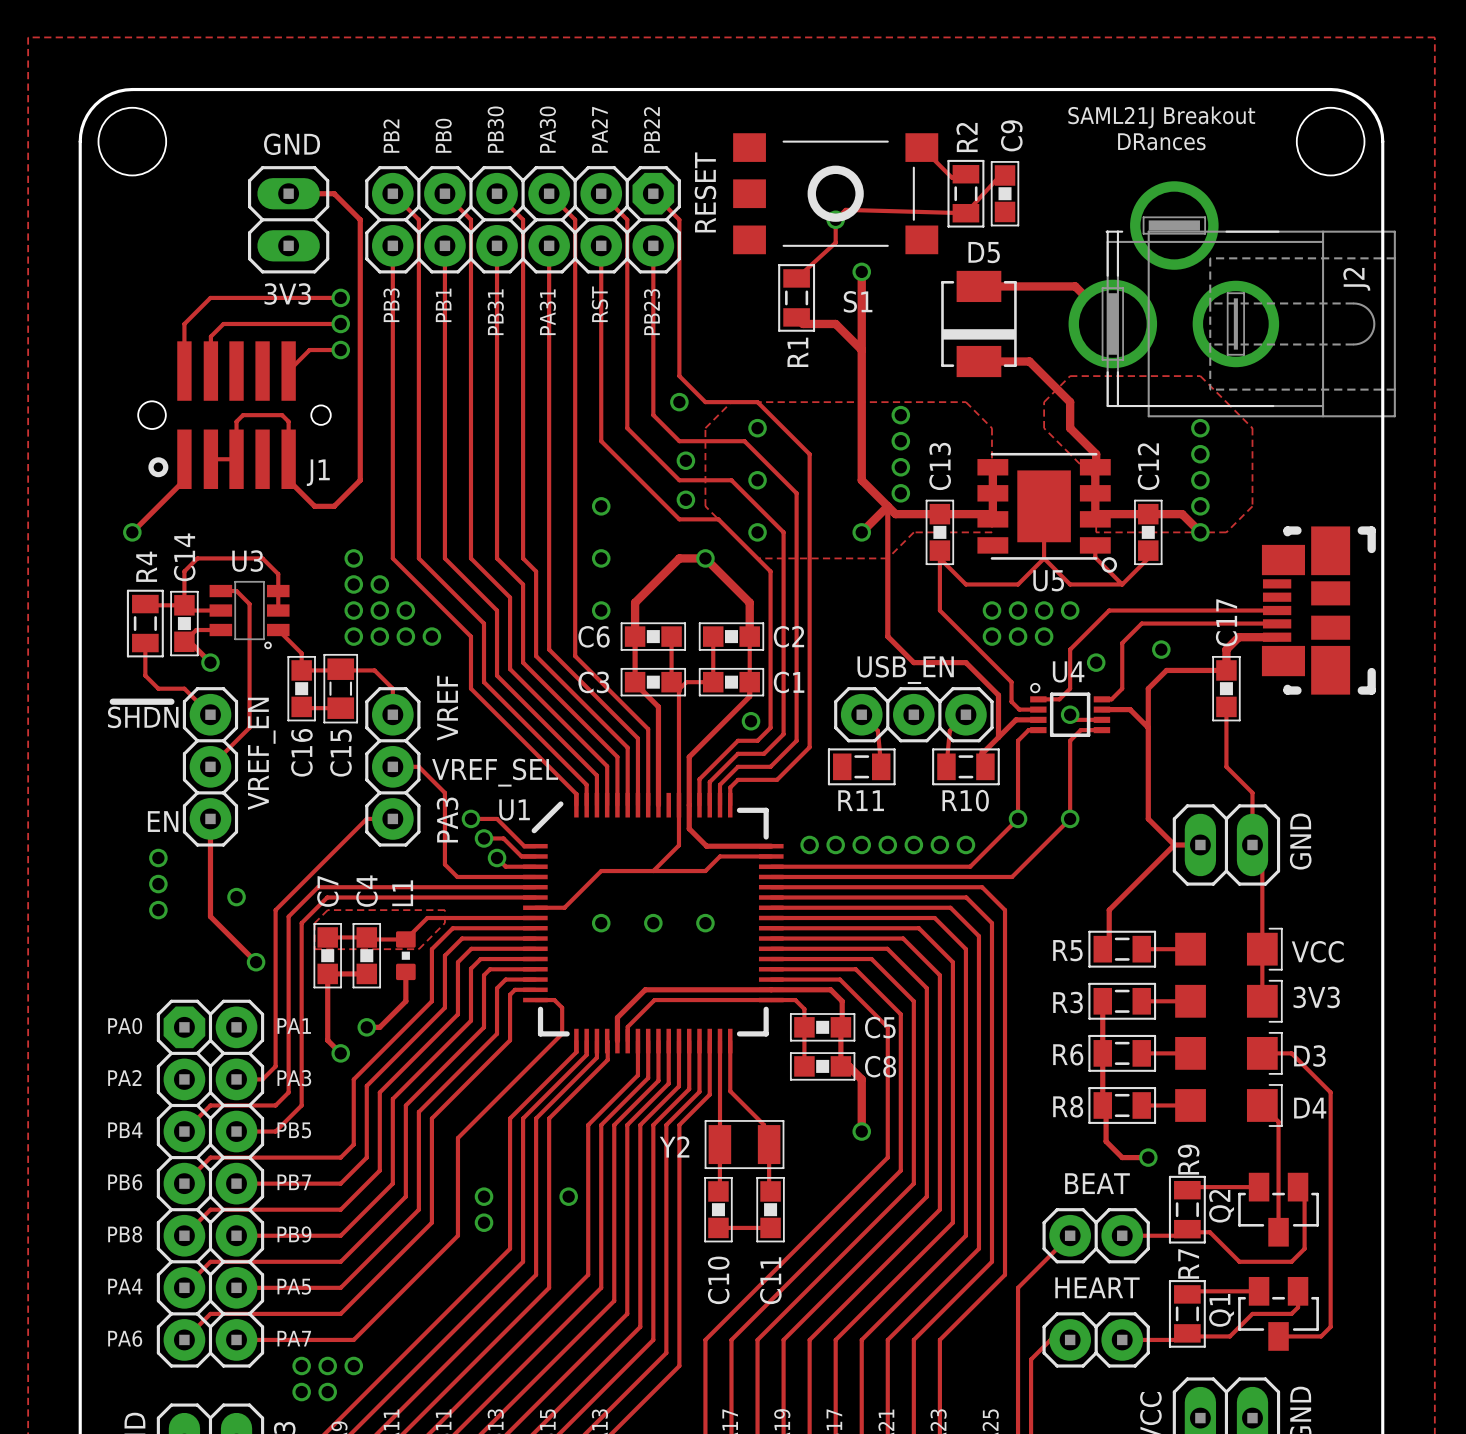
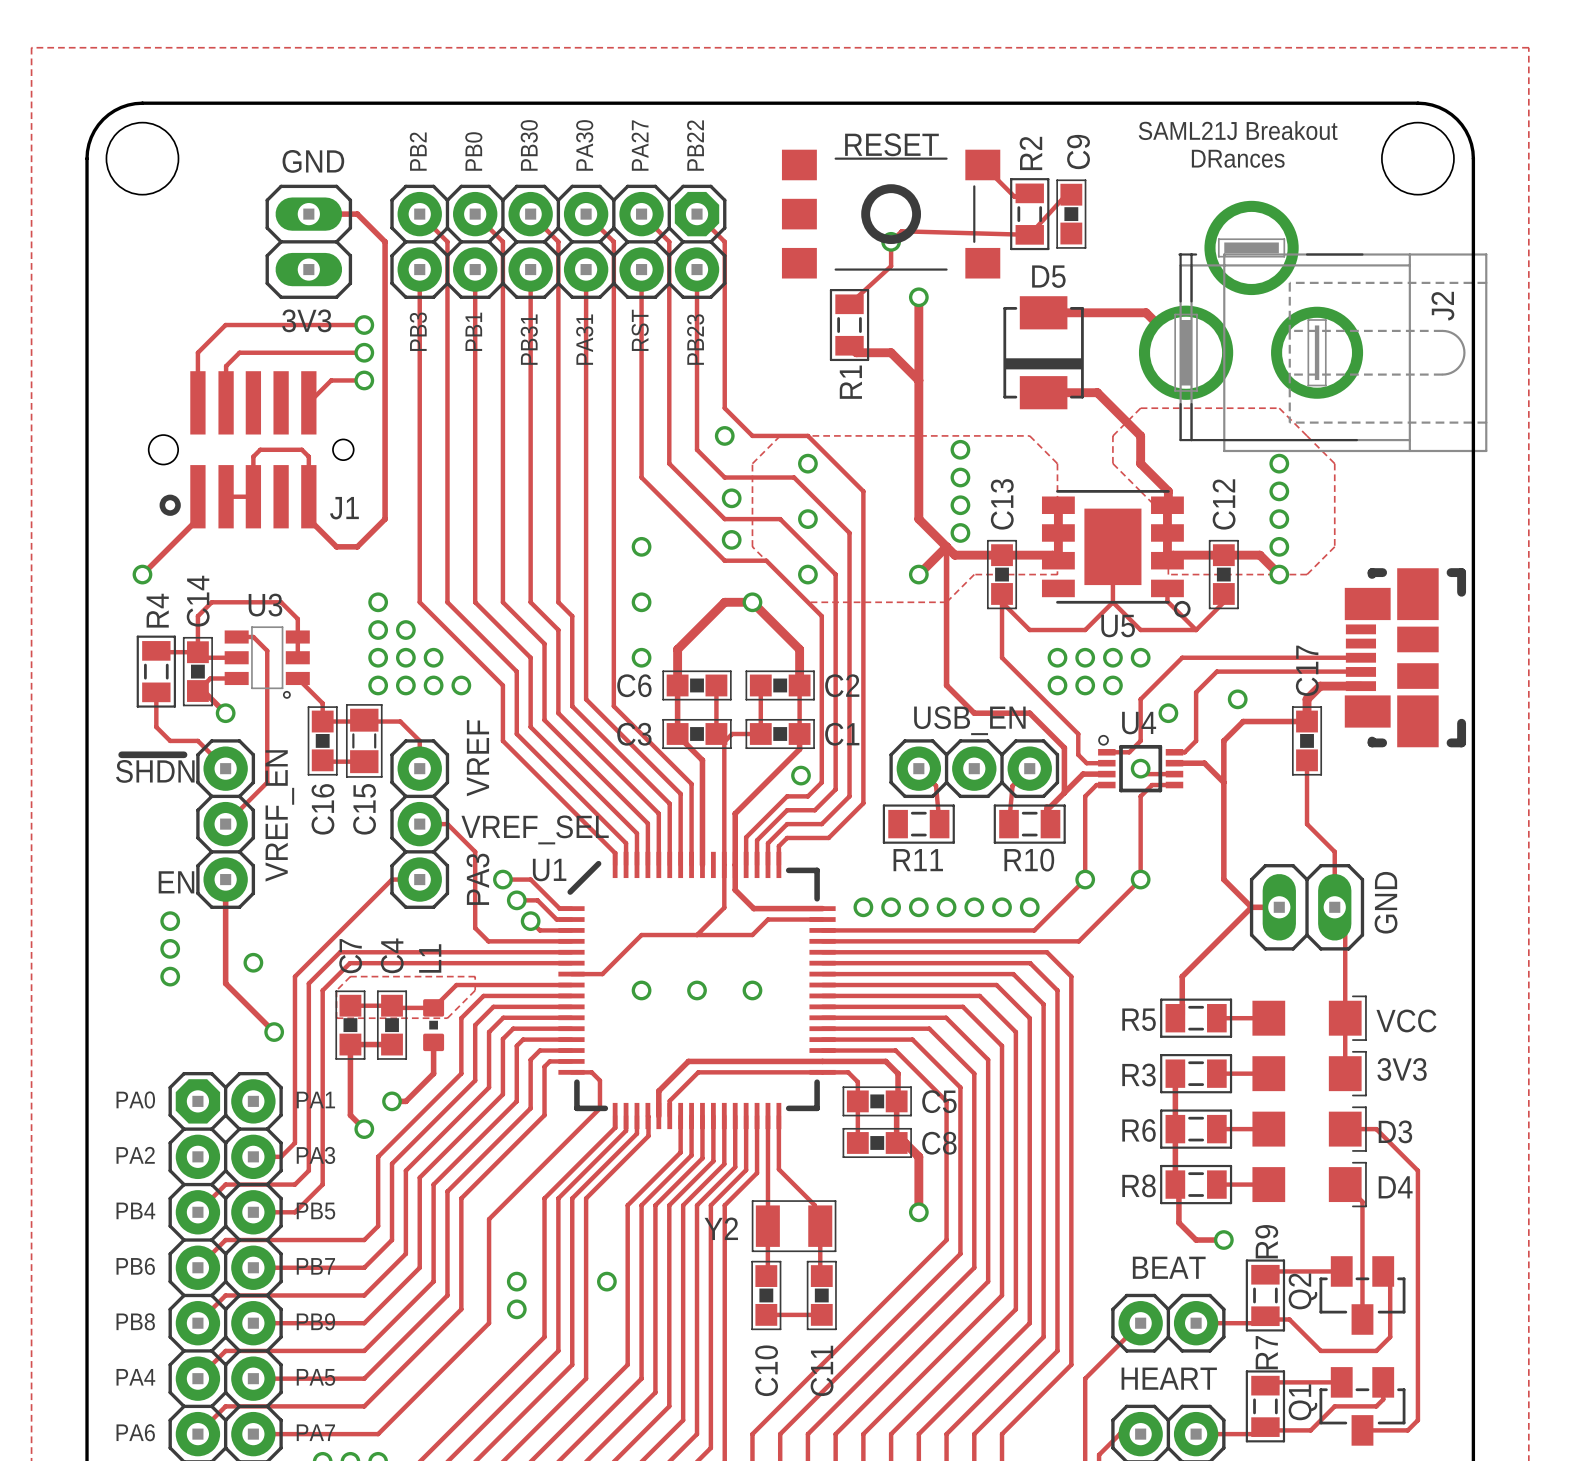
text rotation: 0° (705, 192) -> 90° clockwise (891, 144)
text position: RESET (705, 192) -> RESET (891, 144)
S1 name: S1 (858, 301) -> none

